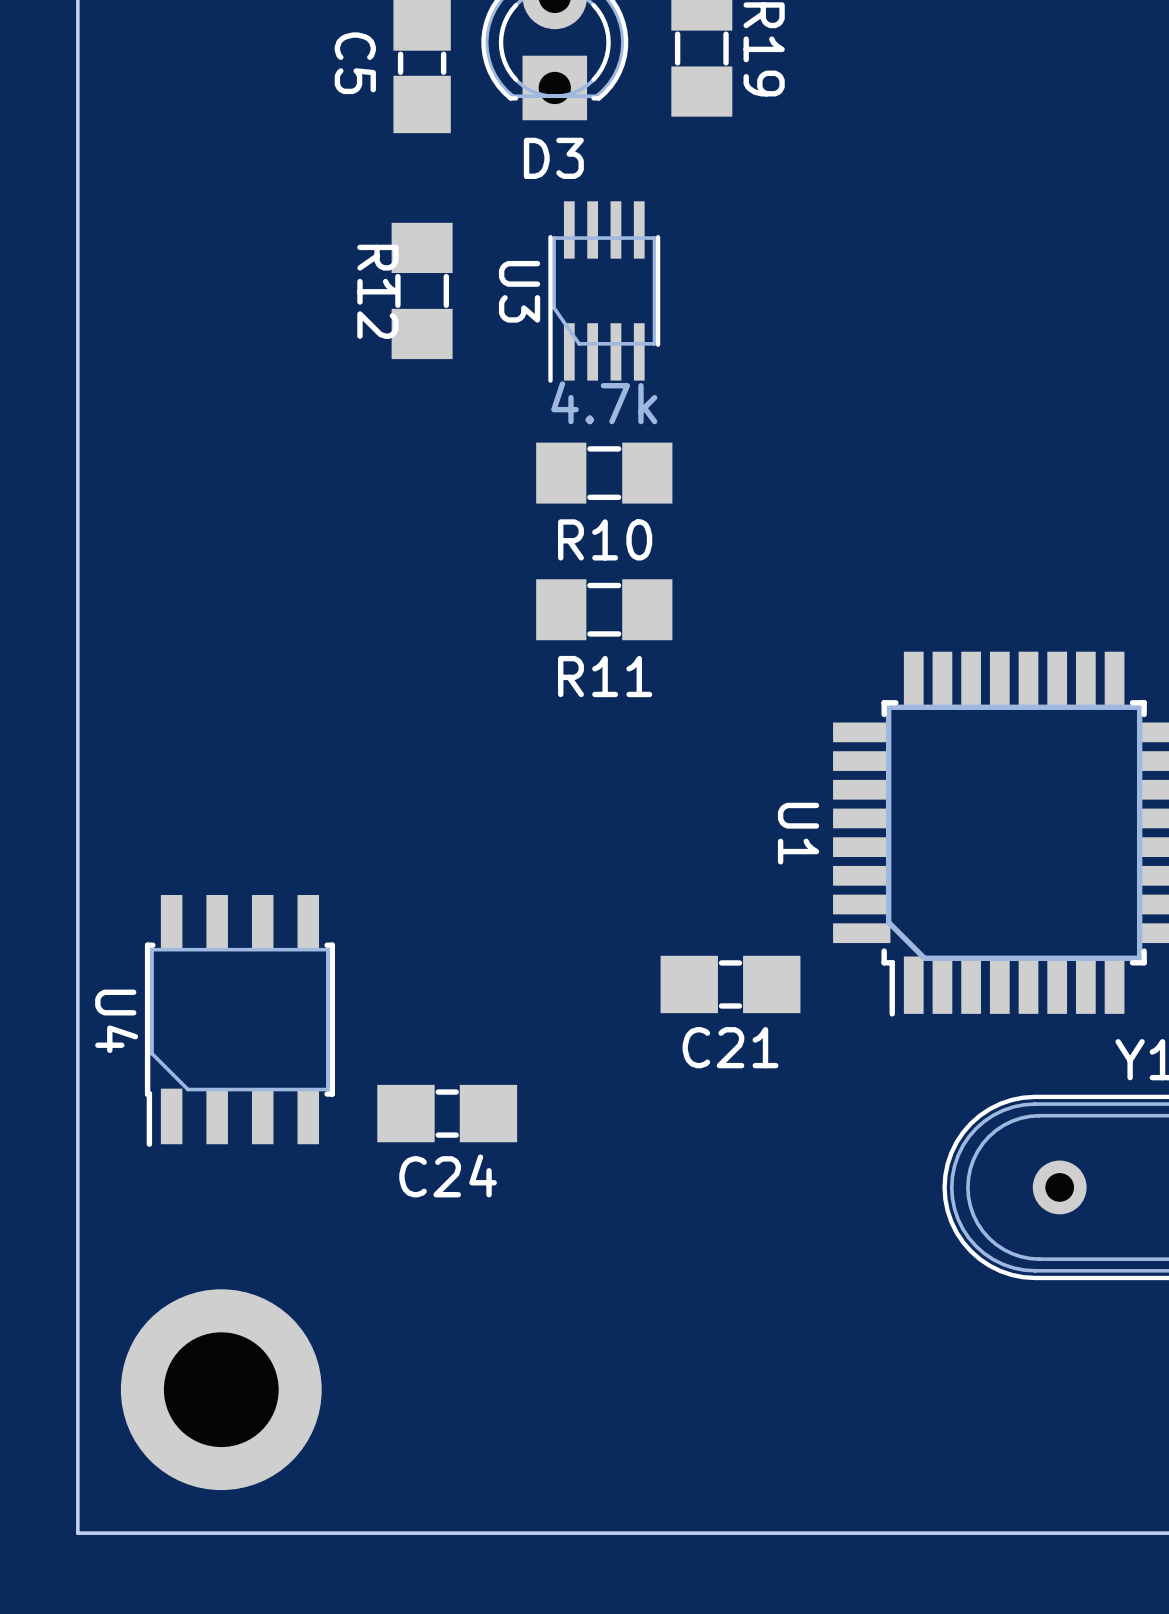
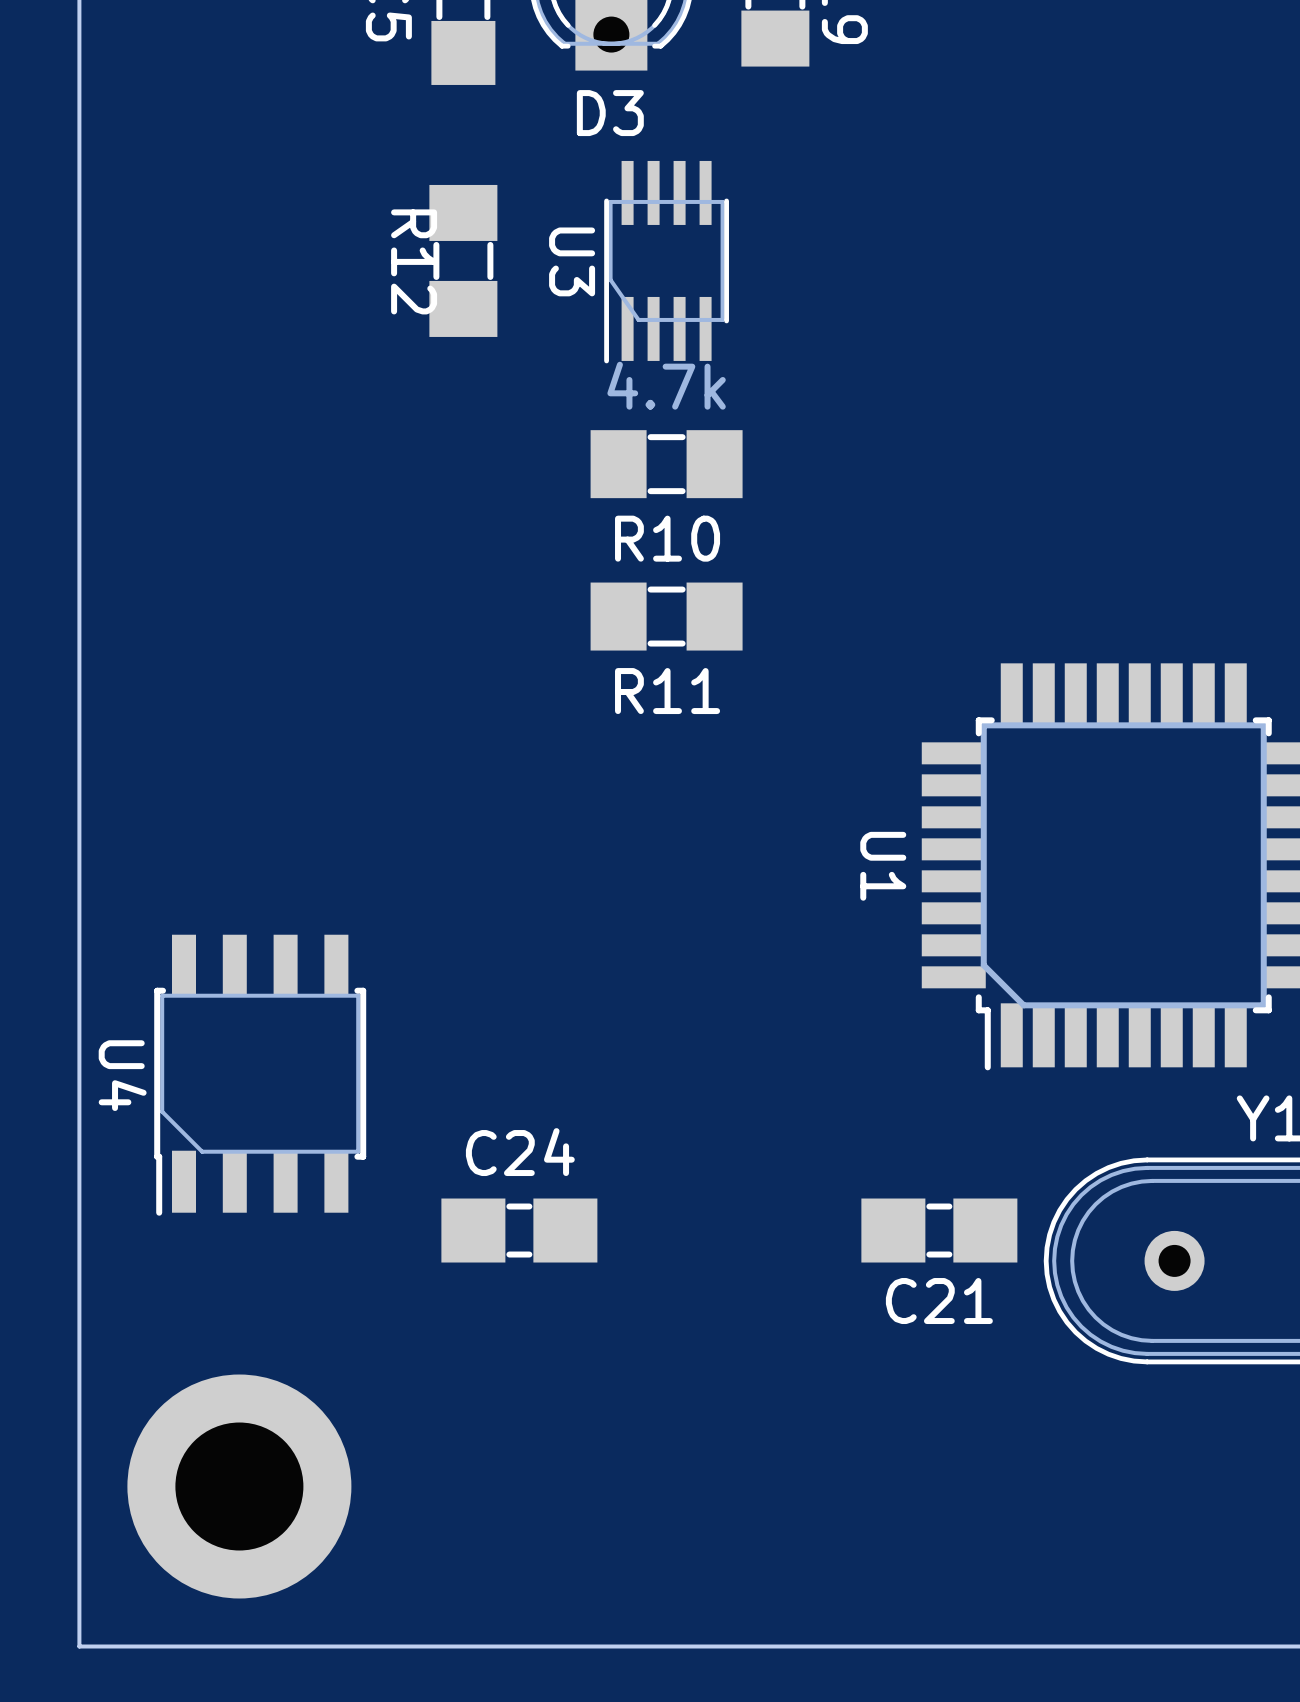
C21 position: (730, 984) -> (939, 1230)
C24 position: (447, 1113) -> (519, 1230)
C24 name position: C24 (448, 1175) -> C24 (520, 1152)

